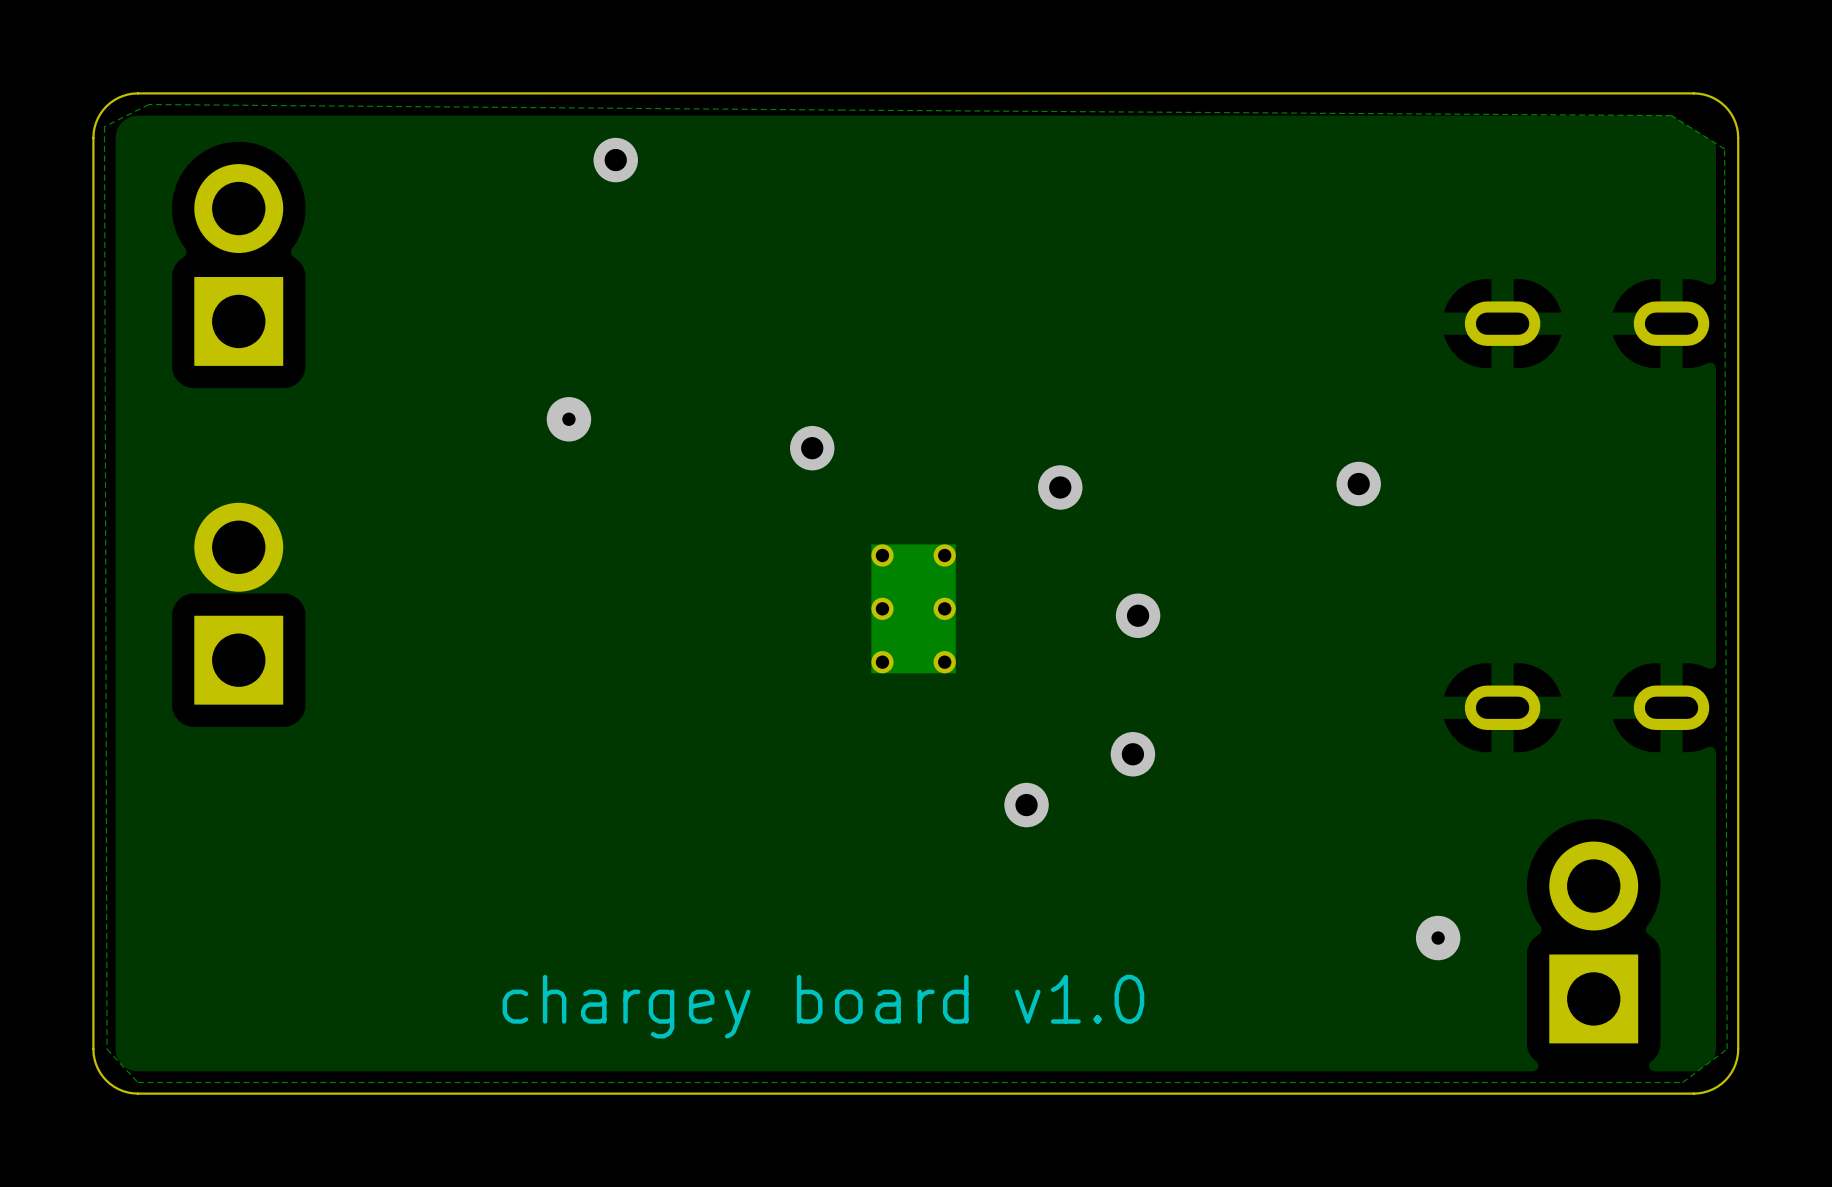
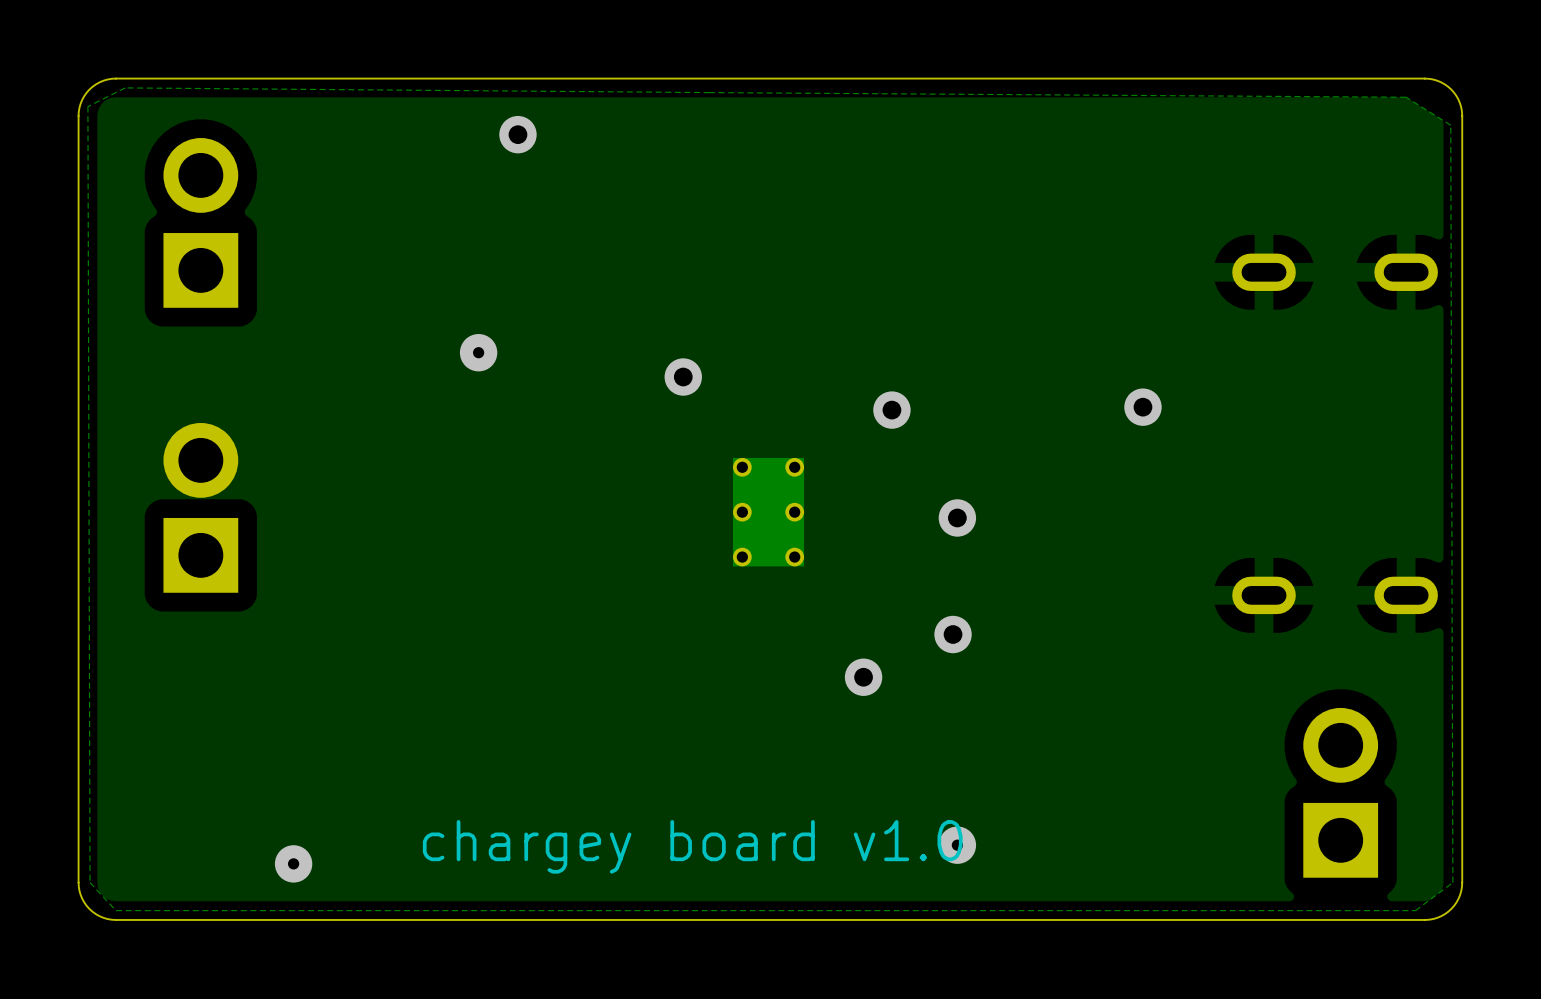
via: (1438, 938) -> none
via: none -> (957, 845)
via: none -> (293, 863)

